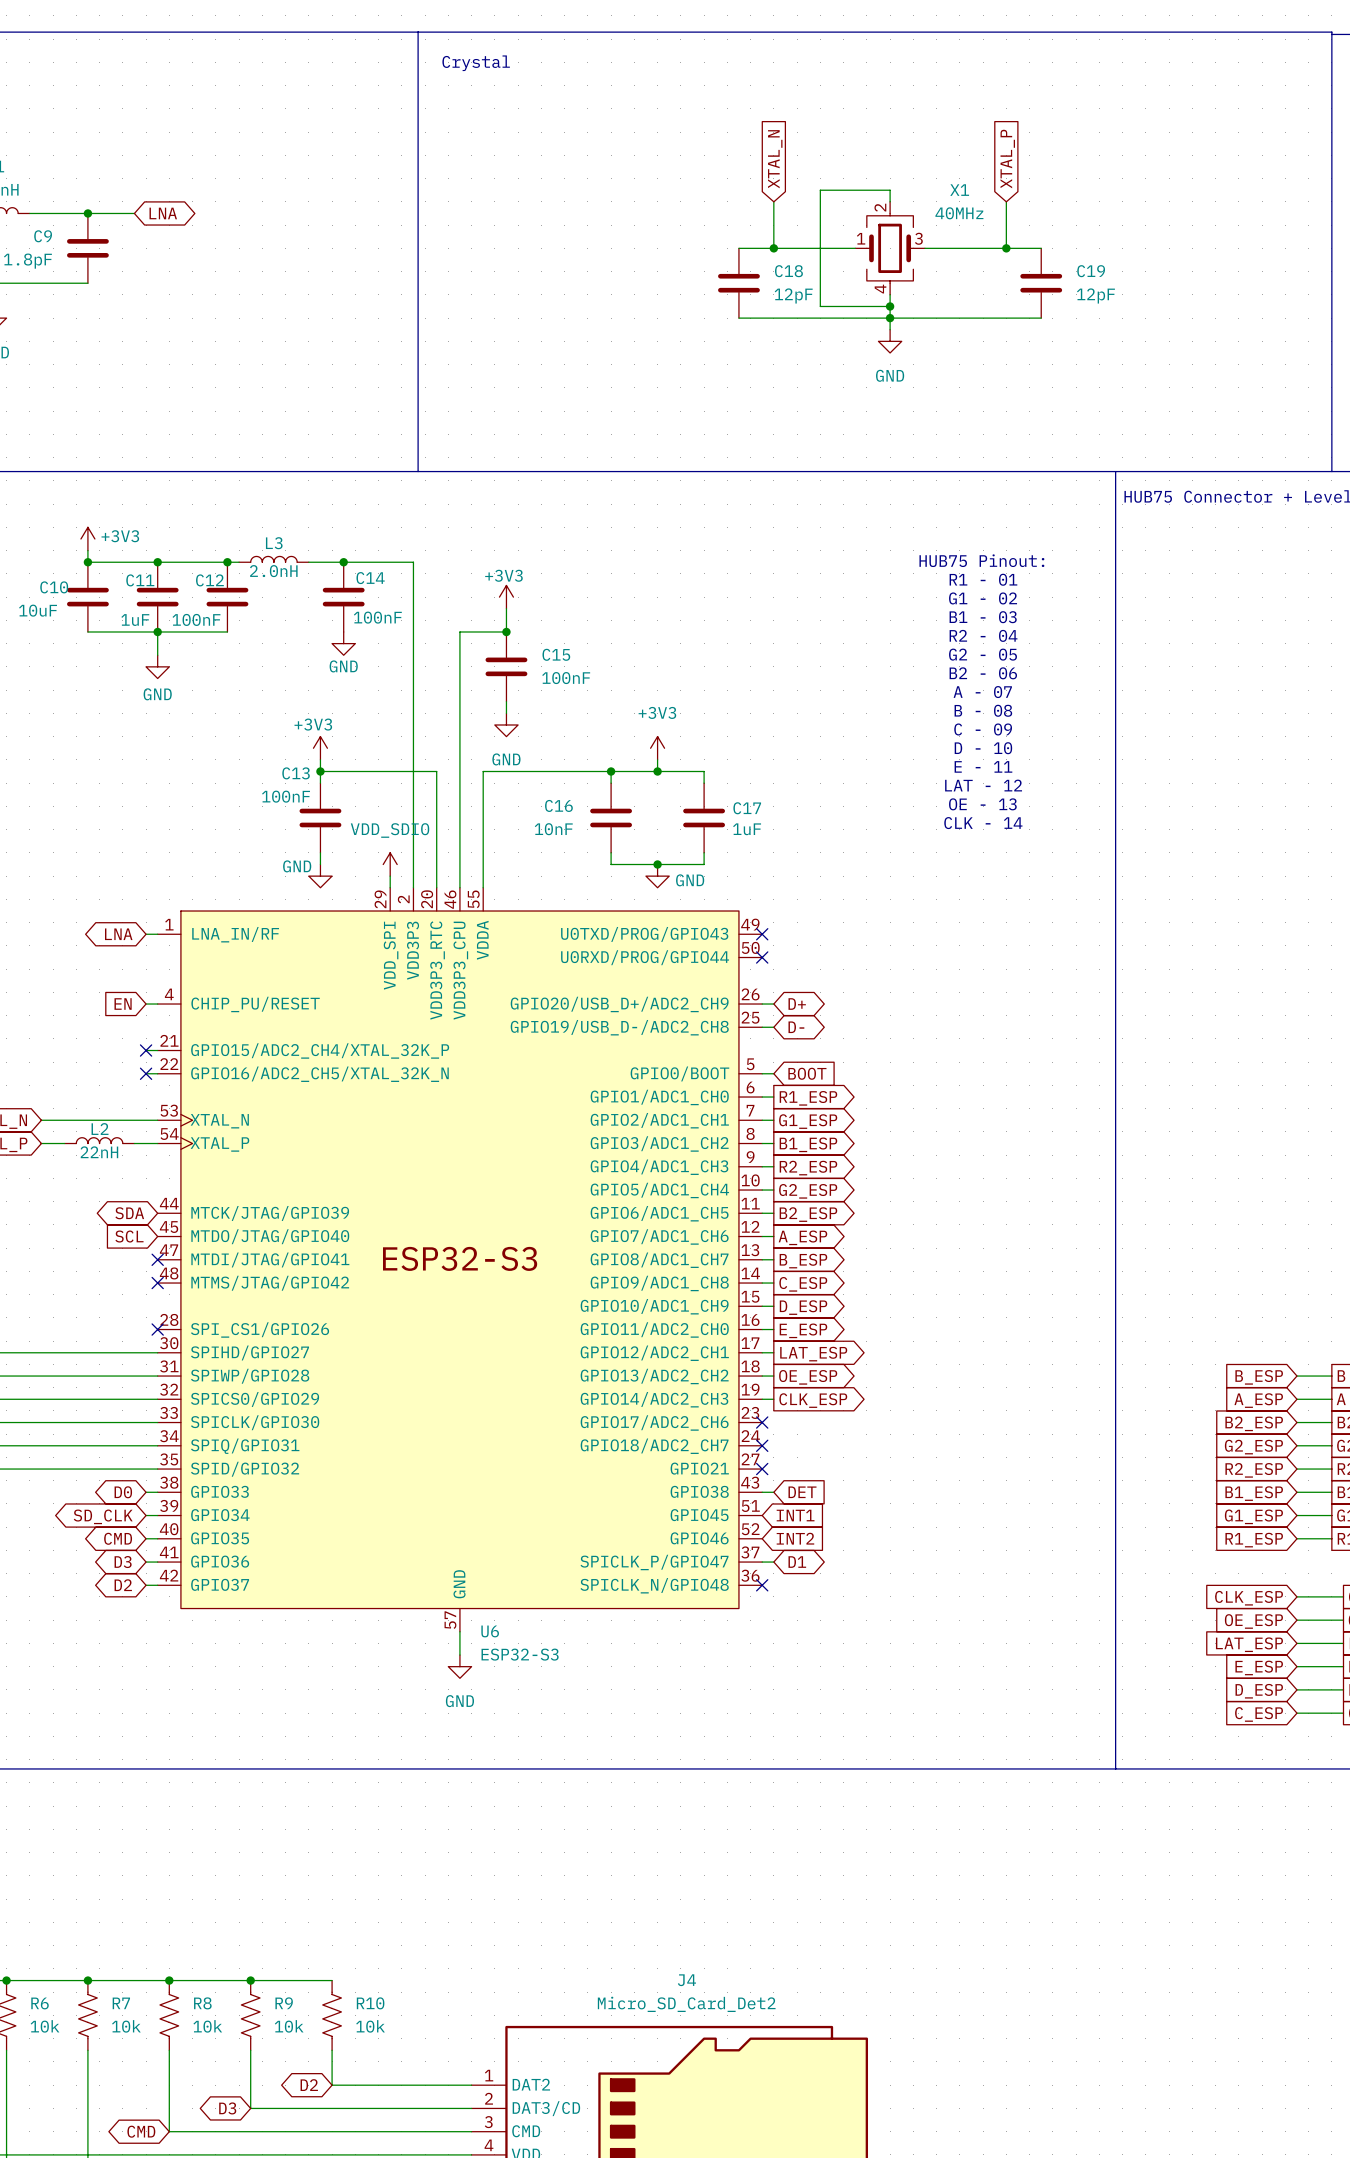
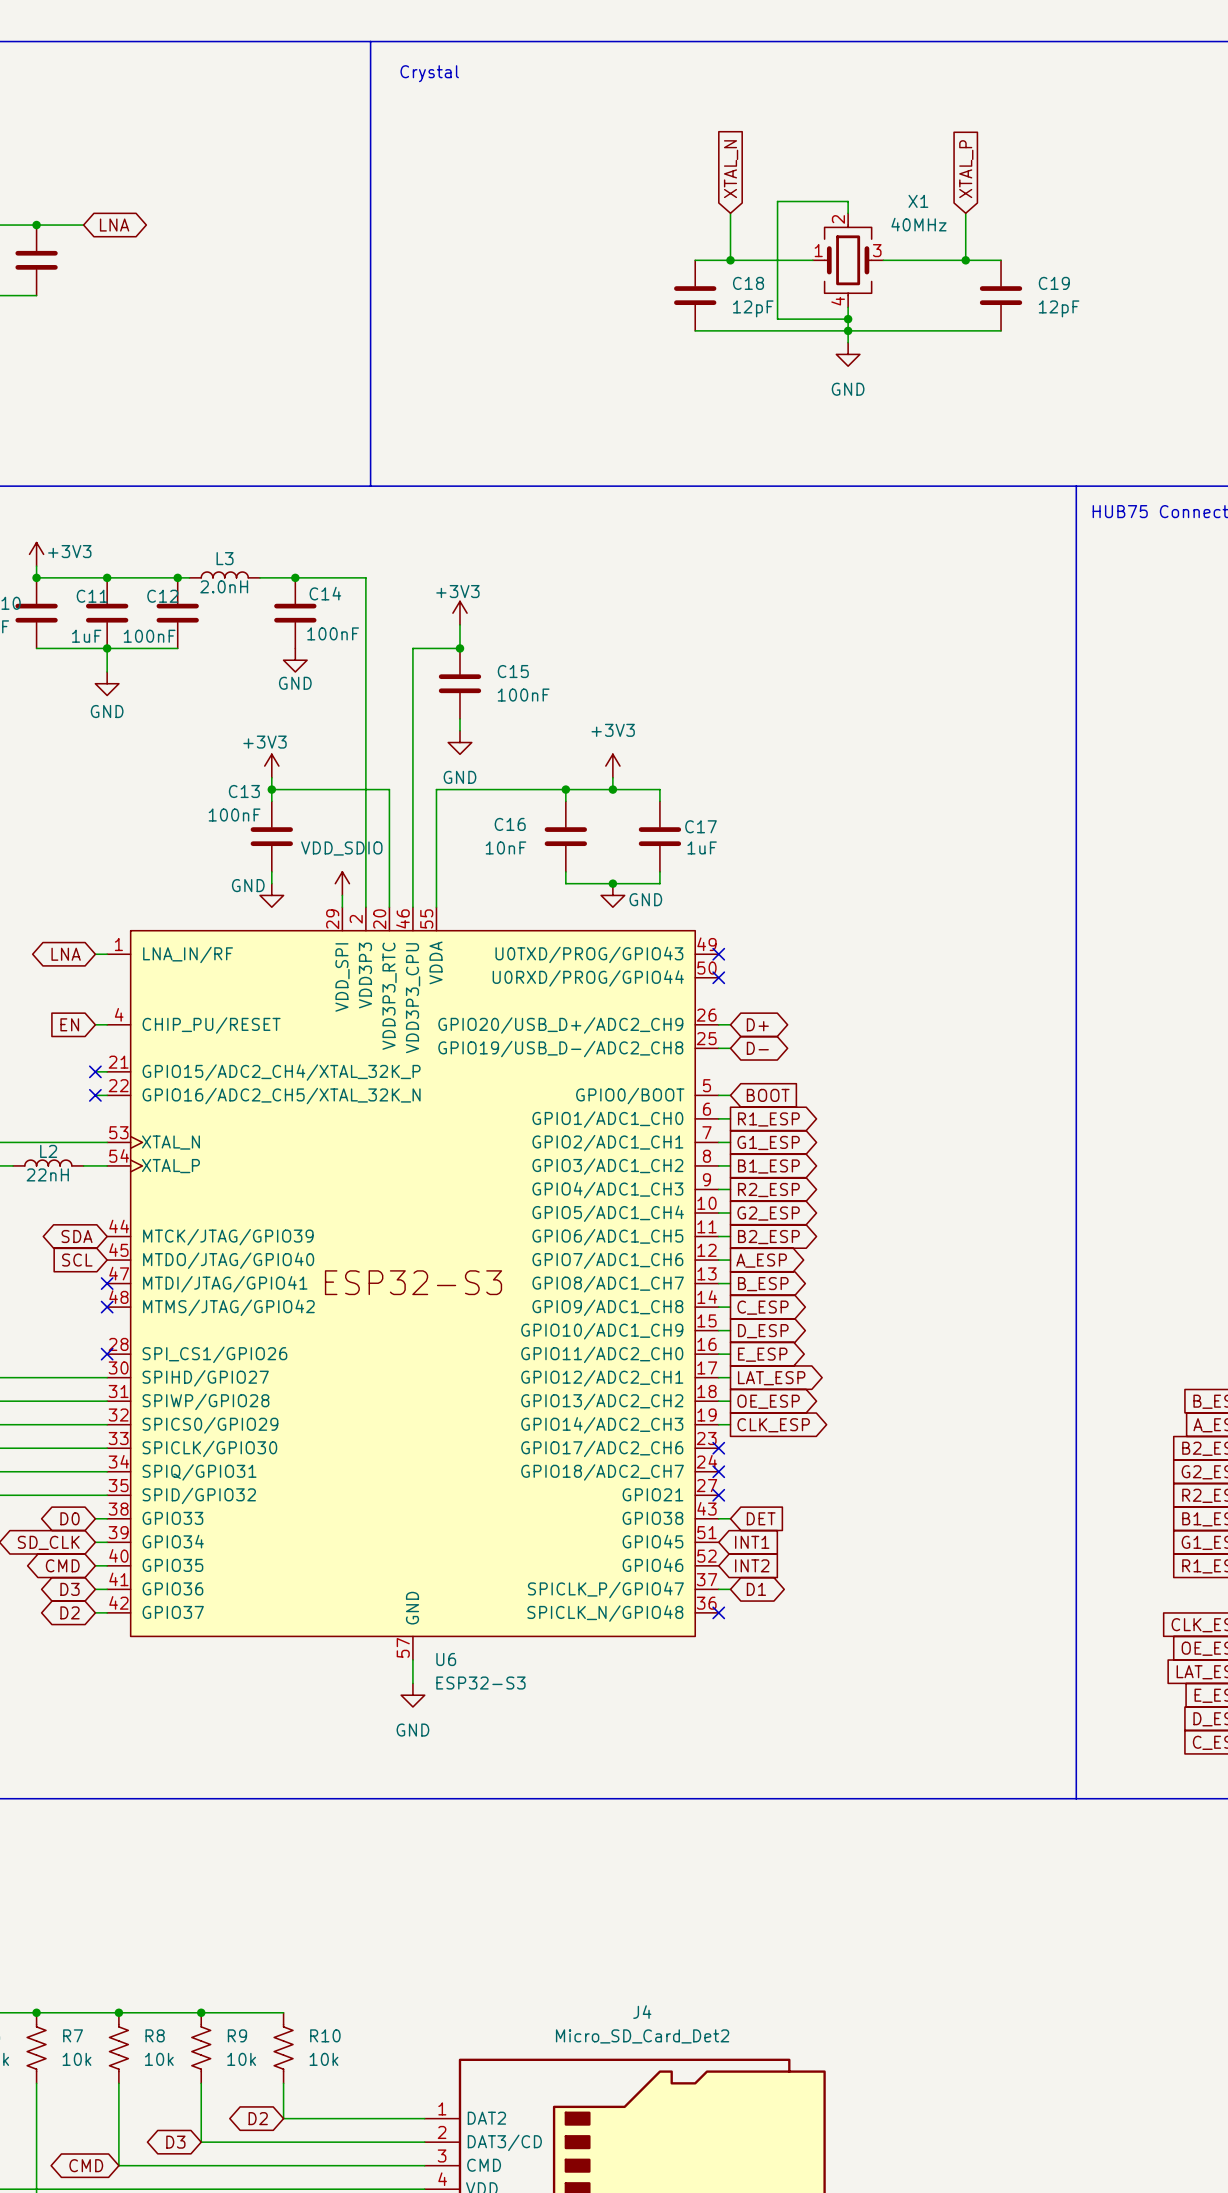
text: HUB75 Pinout: (981, 560) -> none
text: R1 - 01 (983, 579) -> none
text: G1 - 02 (983, 598) -> none
text: B1 - 03 (983, 617) -> none
text: R2 - 04 (983, 635) -> none
text: G2 - 05 (983, 654) -> none
text: B2 - 06 (983, 673) -> none
text: A - 07 (982, 692) -> none
text: B - 08 (983, 710) -> none
text: C - 09 (983, 729) -> none
text: D - 10 (983, 748) -> none
text: E - 11 (983, 766) -> none
text: LAT - 12 (983, 785) -> none
text: OE - 13 (982, 804) -> none
text: CLK - 14 (983, 823) -> none

